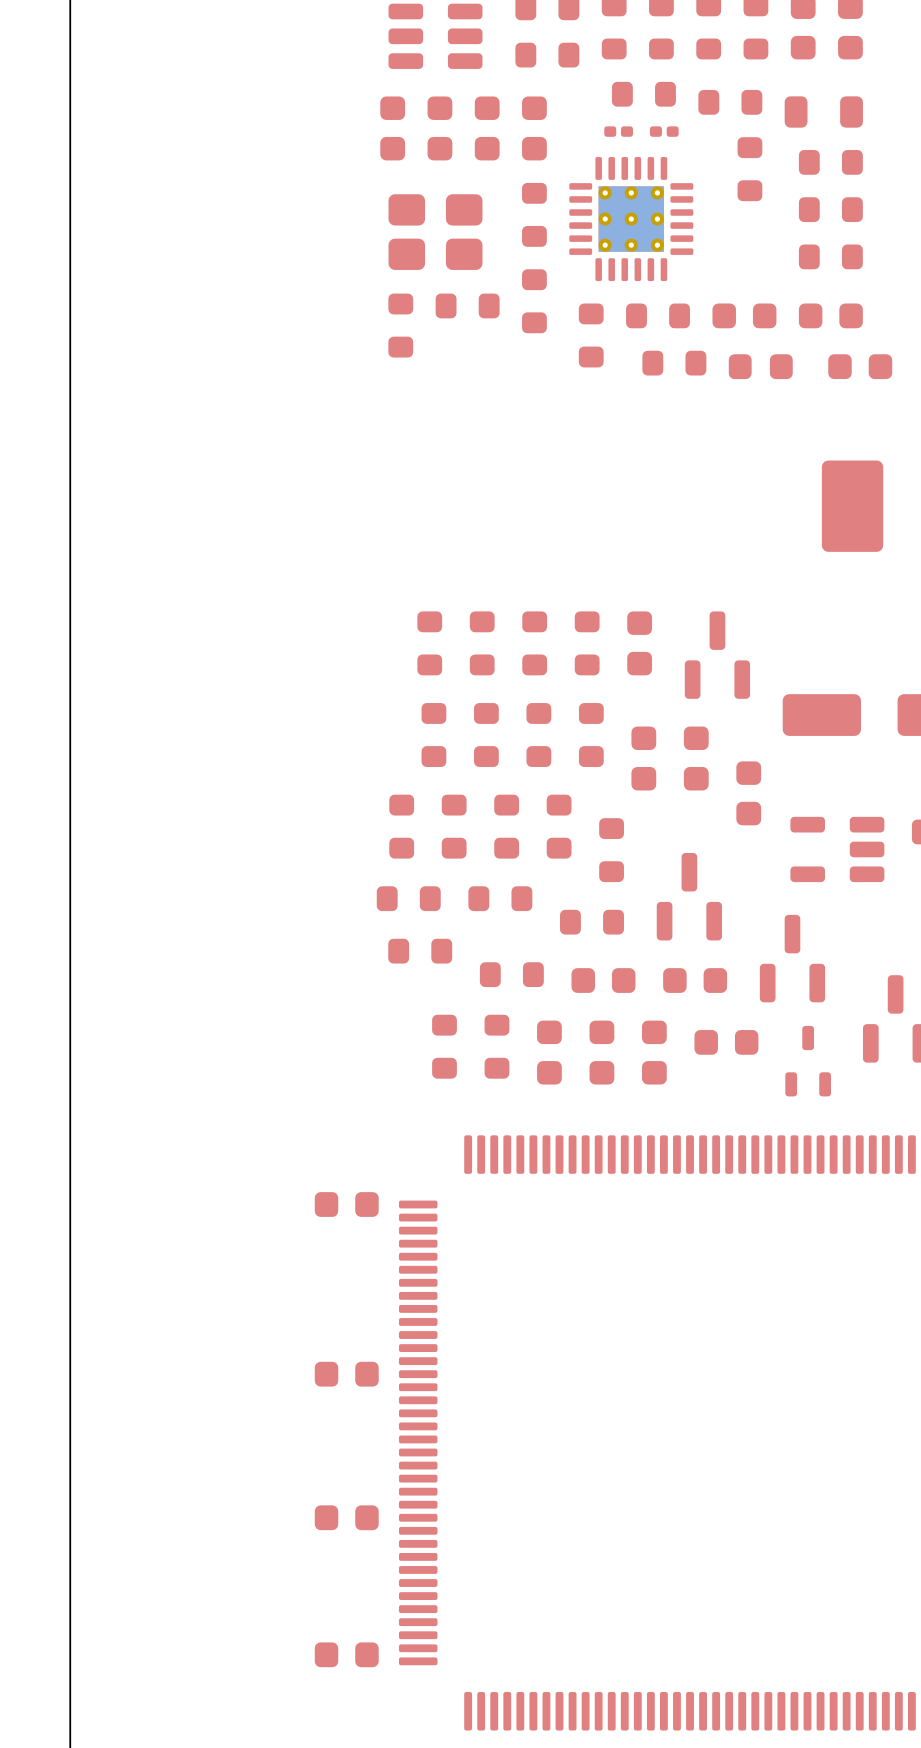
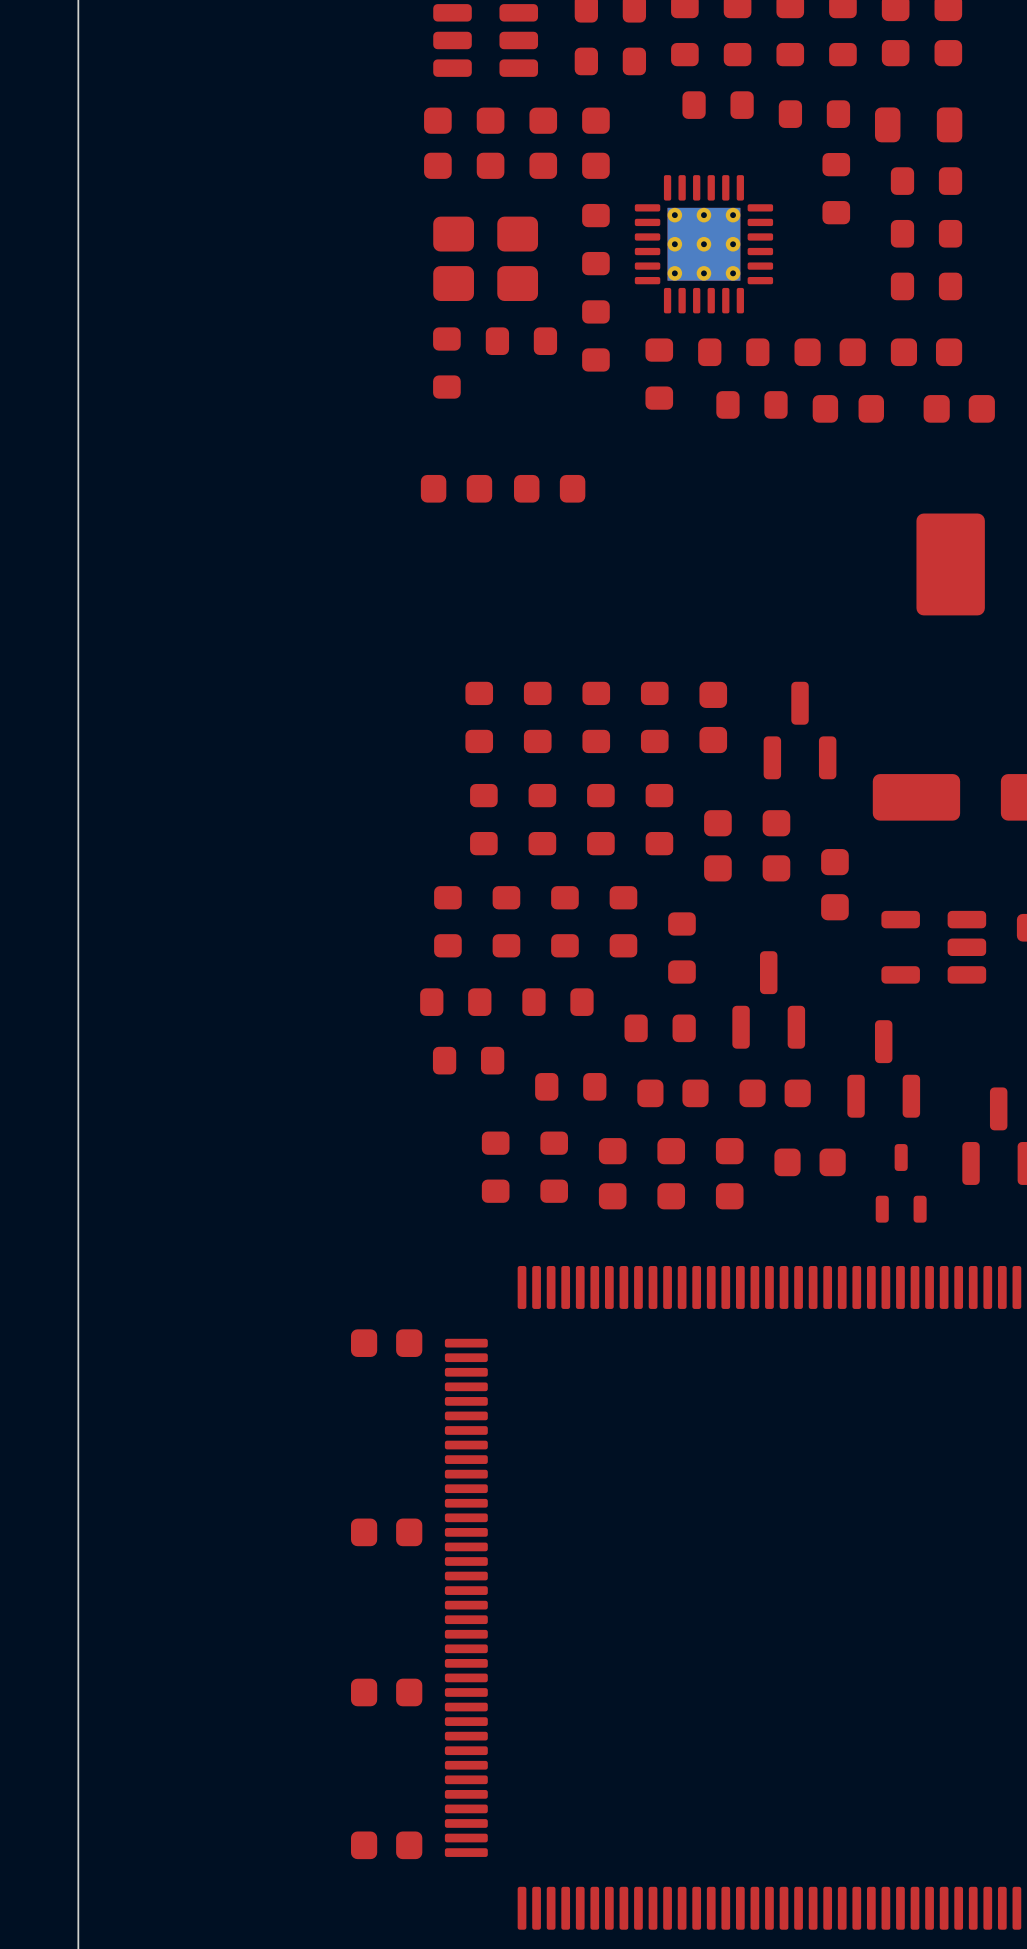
part: (618, 131) -> none
part: (664, 131) -> none
part: none -> (456, 488)
part: none -> (549, 488)

